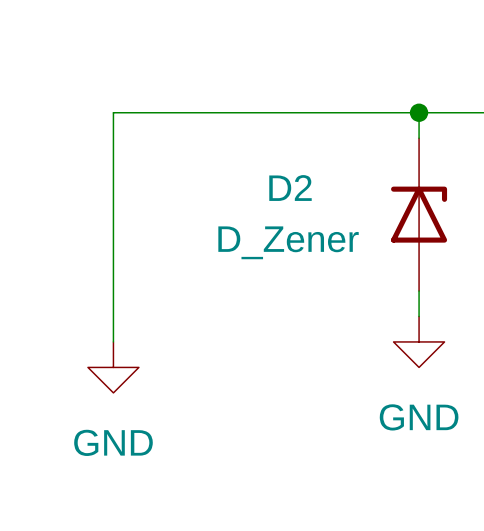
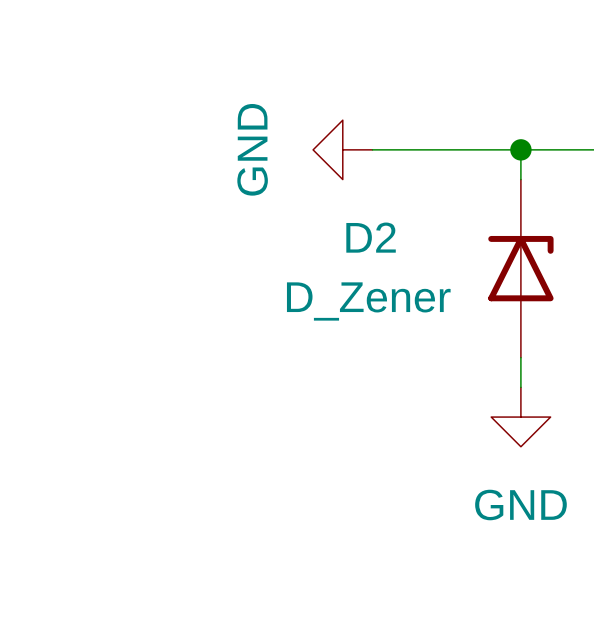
wire: (291, 112) (113, 112) (113, 341) -> none
power symbol rotation: 0° (113, 367) -> 90° clockwise (342, 149)
power symbol position: GND (113, 367) -> GND (342, 149)

